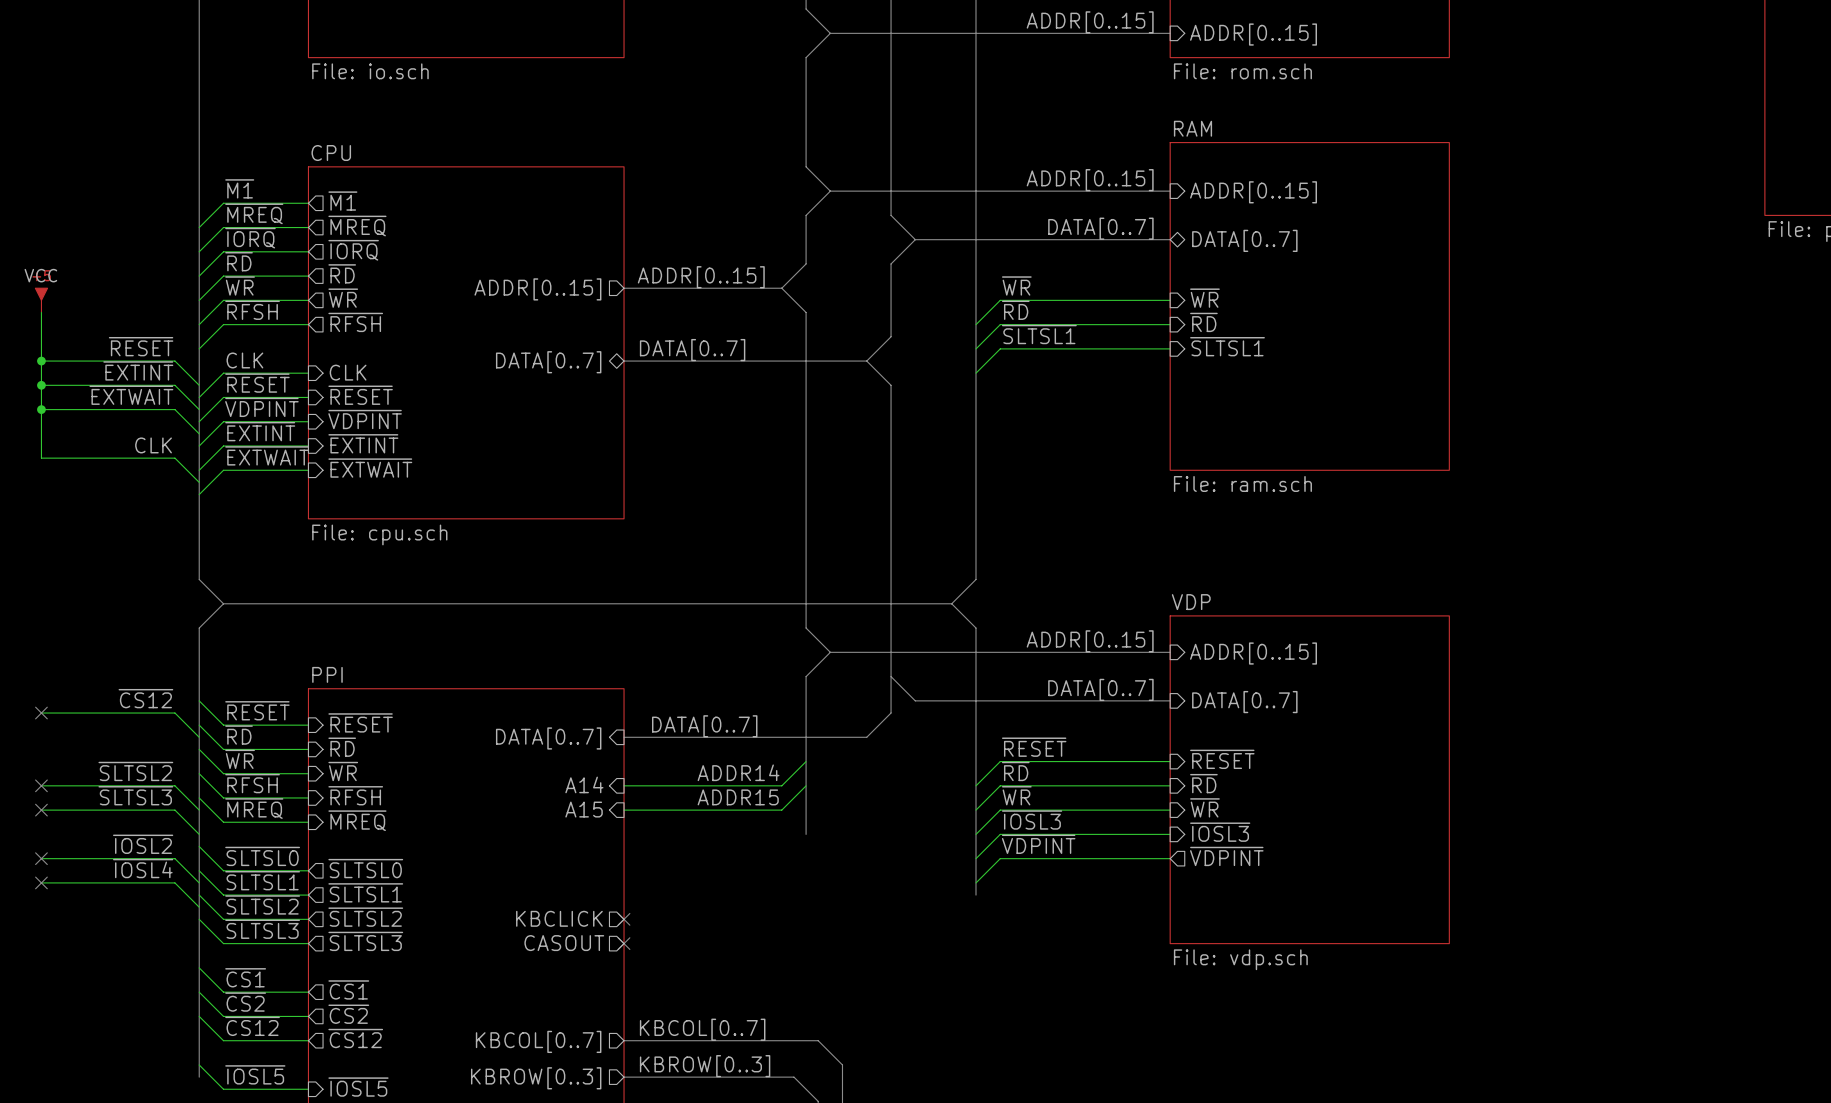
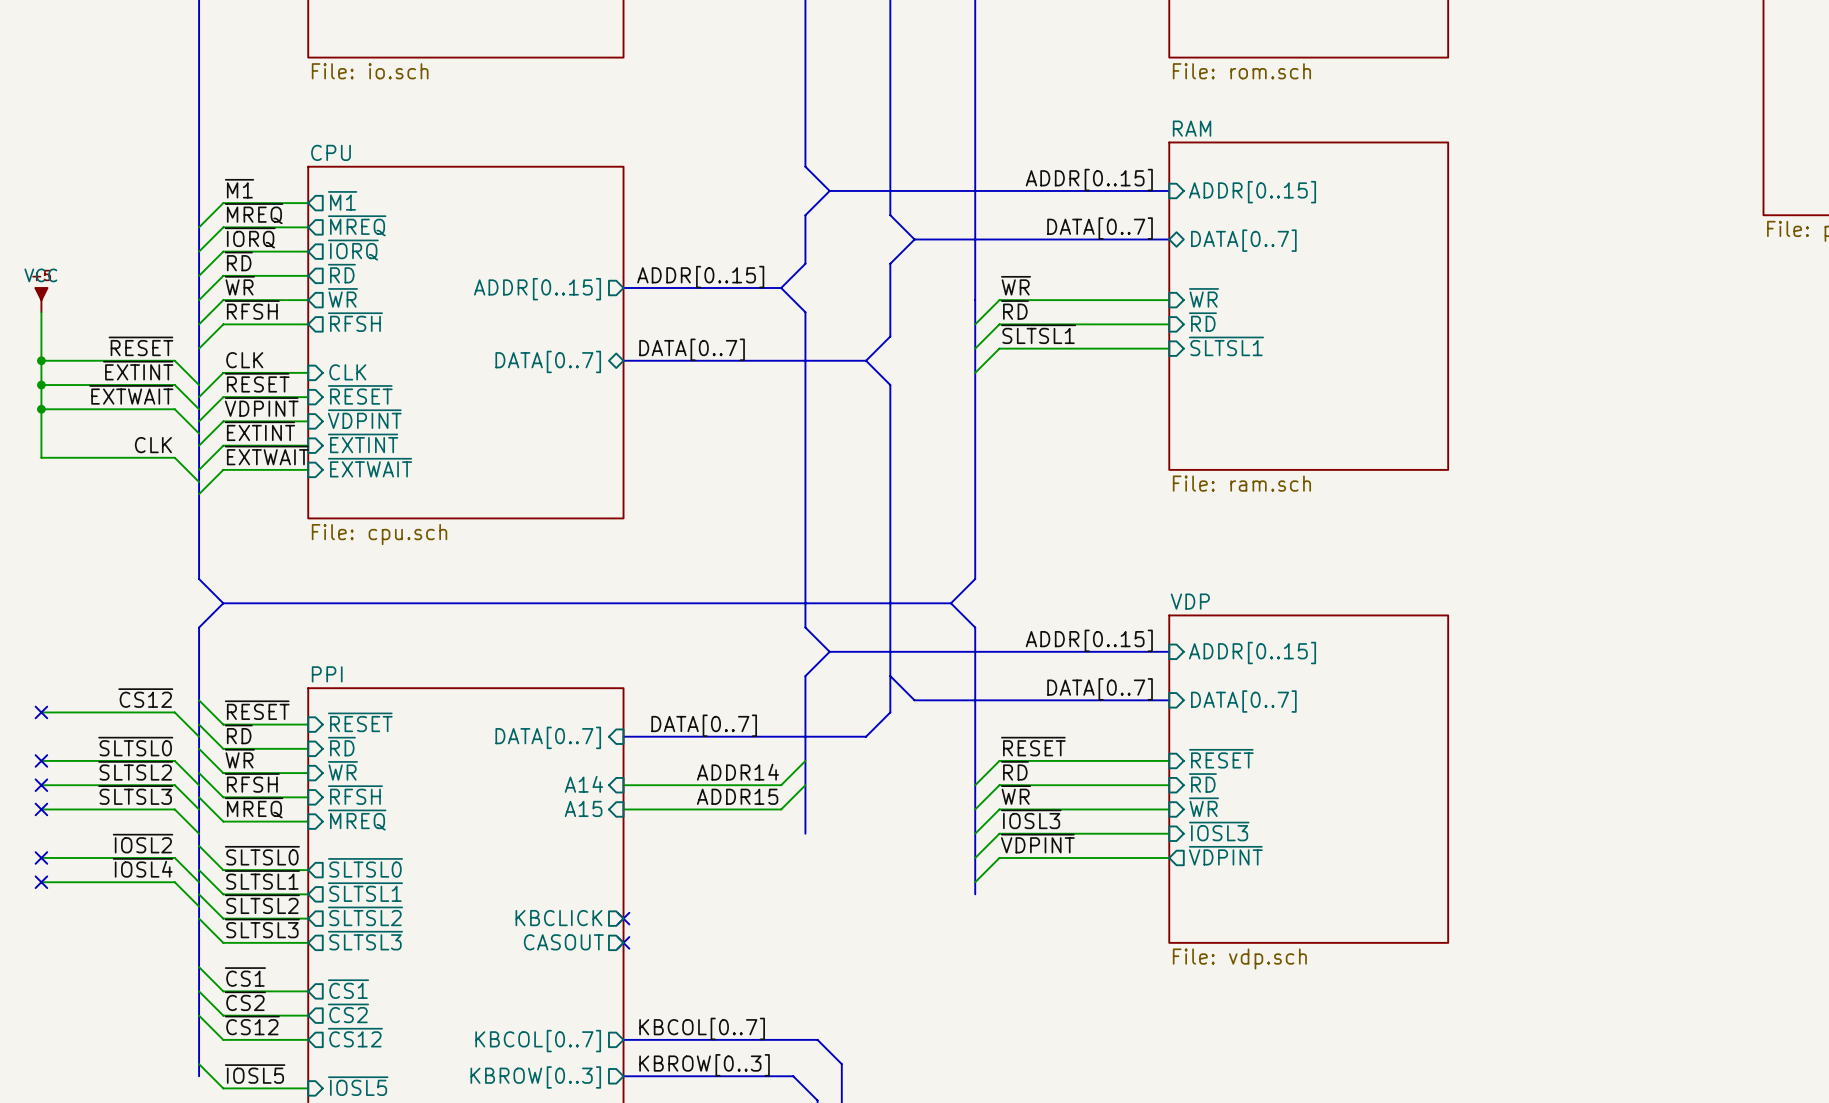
bus: (806, 9) (830, 33) -> none
label: ADDR[0..15] (1090, 22) -> none
bus: (830, 33) (806, 57) -> (805, 9) (805, 57)
bus: (830, 33) (1170, 33) -> none
sheet pin: ADDR[0..15] (1253, 34) -> none
label: none -> ~{SLTSL0} (135, 746)
wire: none -> (41, 760) (174, 760) (199, 785)
no-connect mark: none -> (41, 760)

